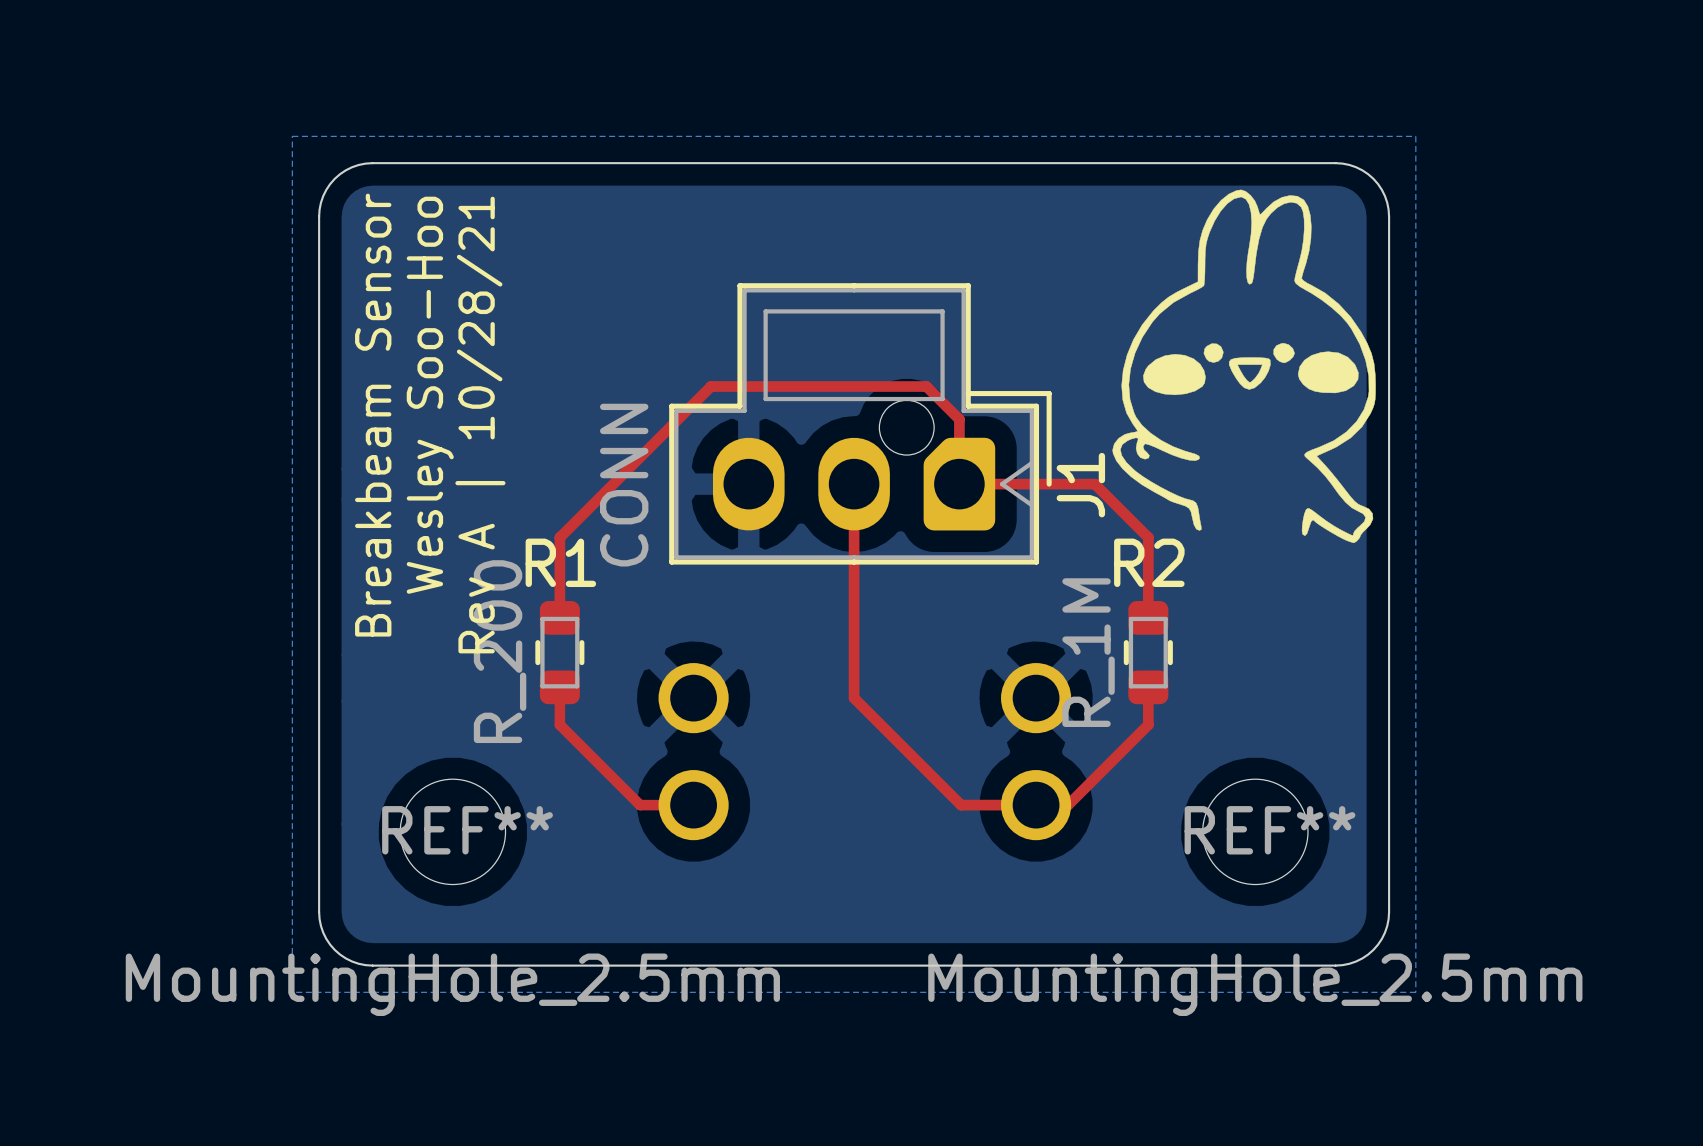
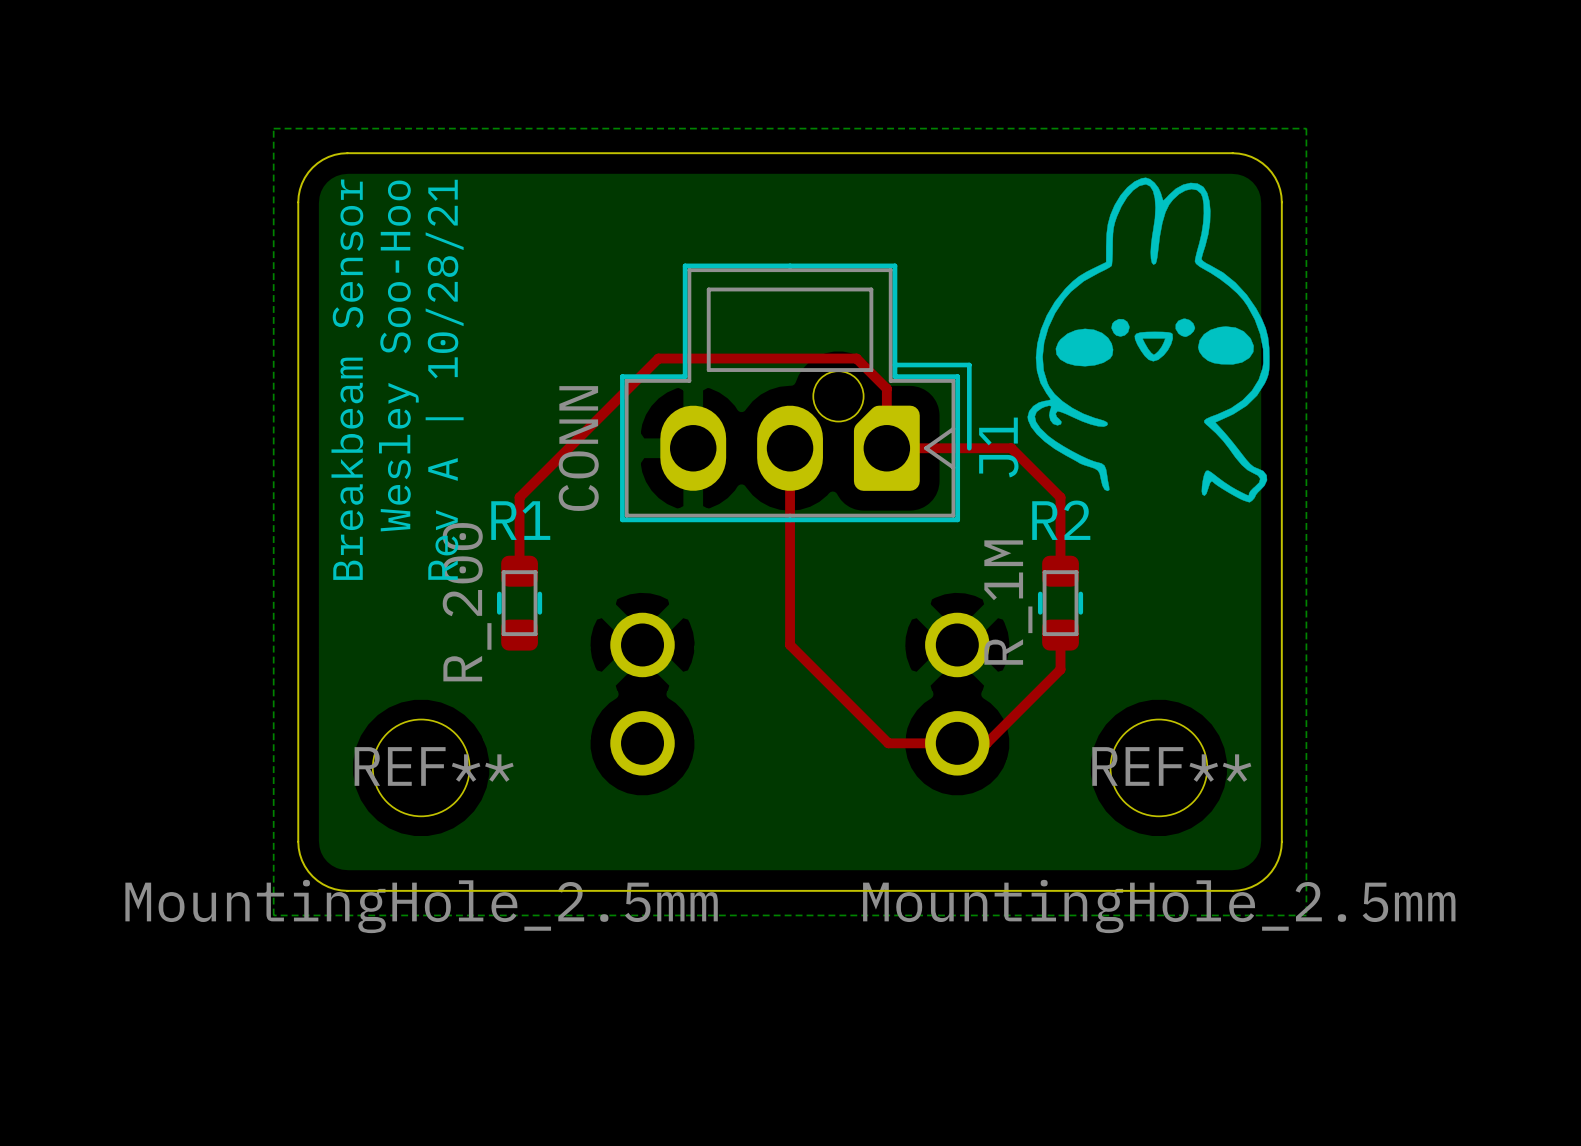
top track: (559, 687) (559, 724) (640, 805) (693, 805) -> none

